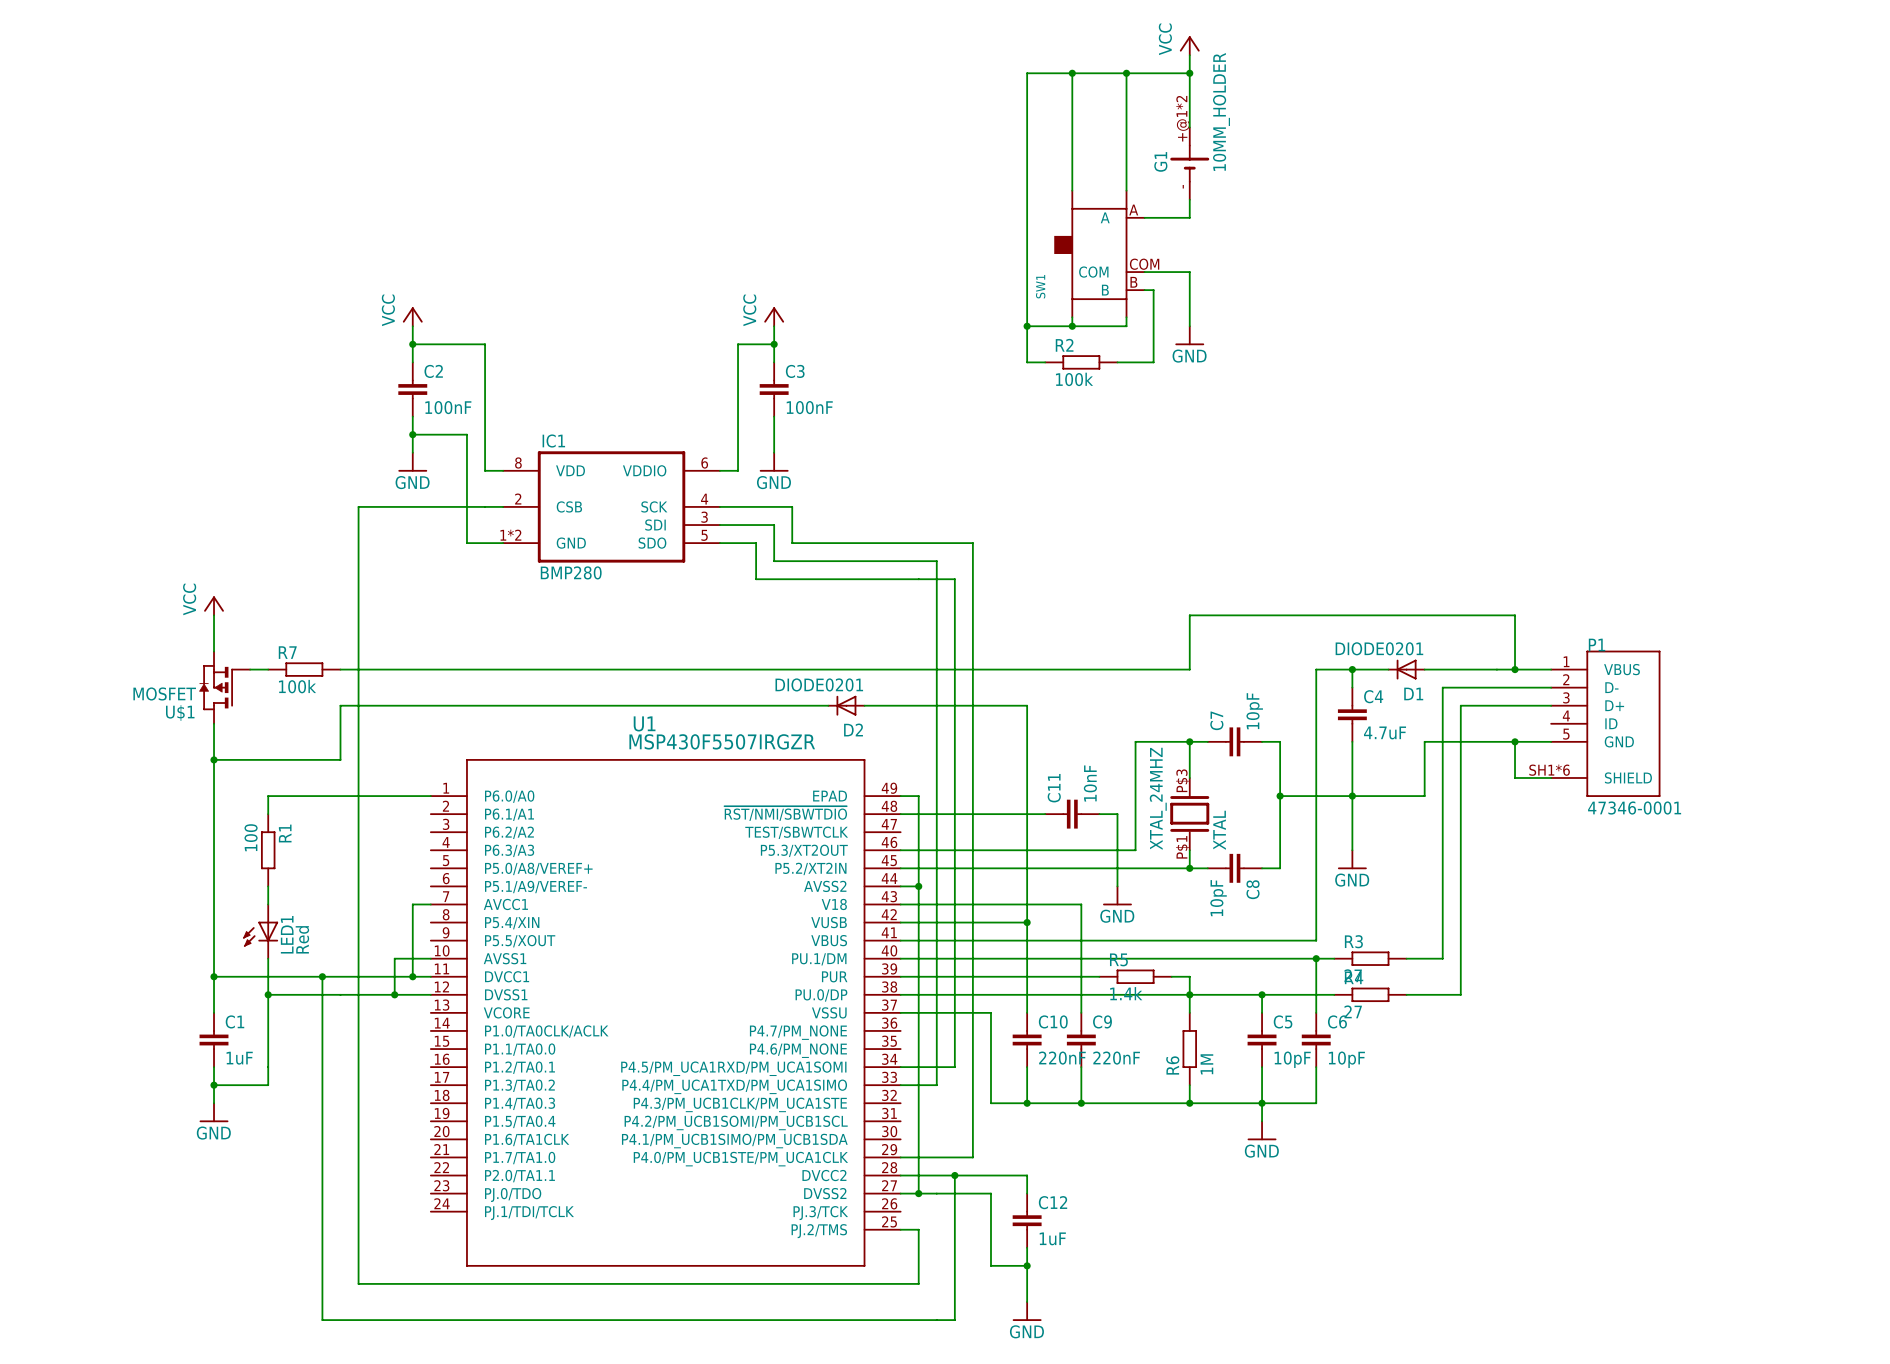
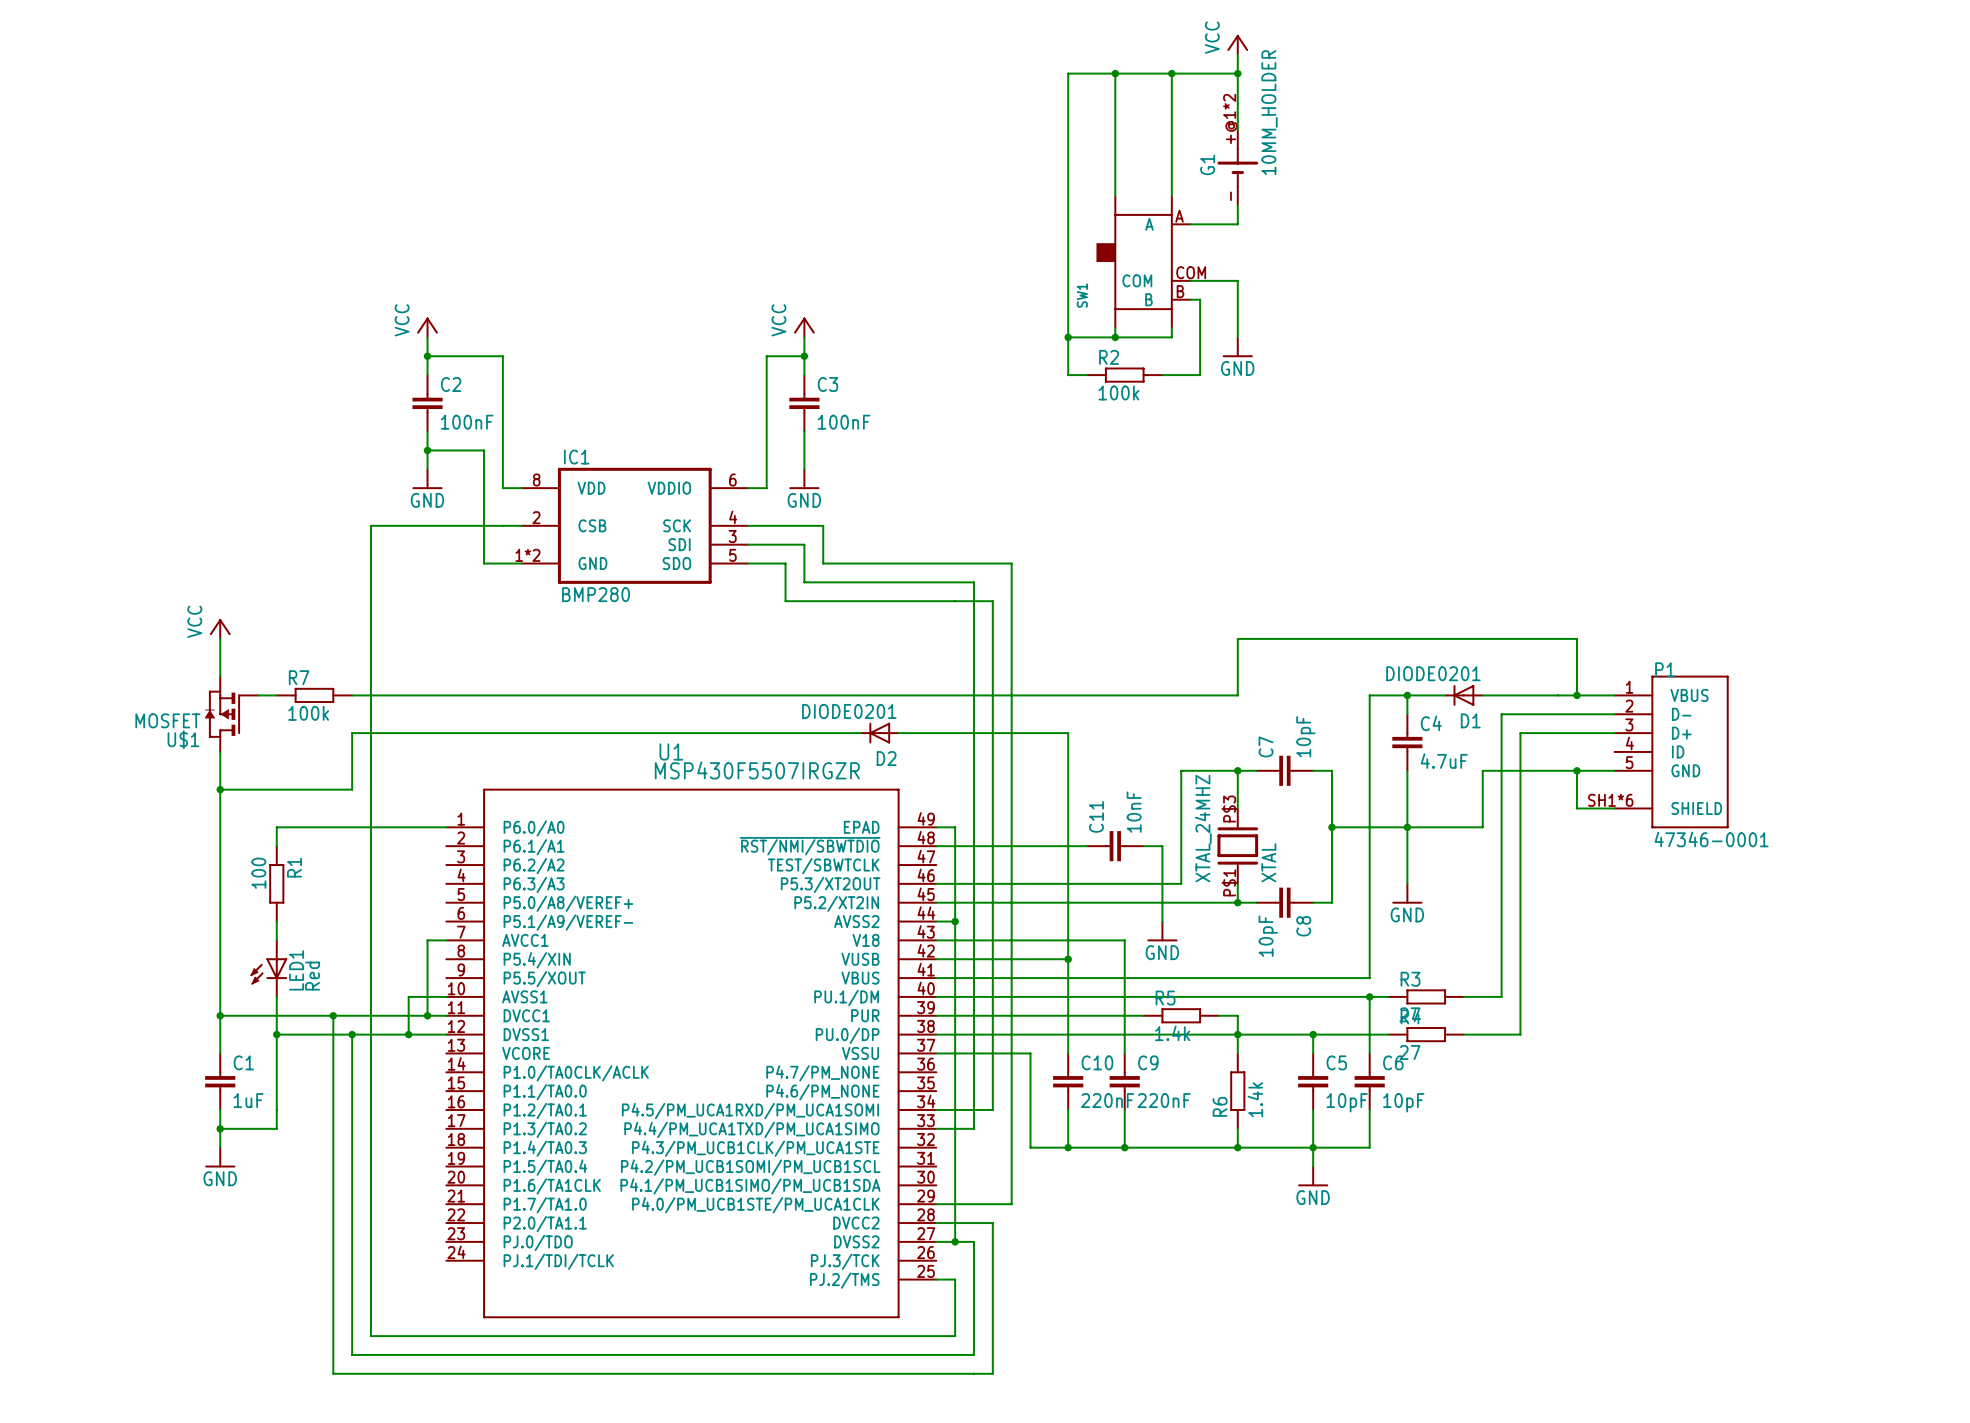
junction: none -> (352, 1034)
R6 value: 1M (1206, 1064) -> 1.4k (1255, 1099)
wire: (954, 1175) (1027, 1175) (1027, 1193) -> none
junction: (954, 1175) -> none
wire: (936, 1193) (990, 1193) (990, 1265) (1027, 1265) -> (973, 1241) (973, 1354) (352, 1354) (352, 1034)
C12: 1uF (1027, 1220) -> none
wire: (1027, 1247) (1027, 1302) -> none
junction: (1027, 1265) -> none
power symbol: GND (1027, 1311) -> none

